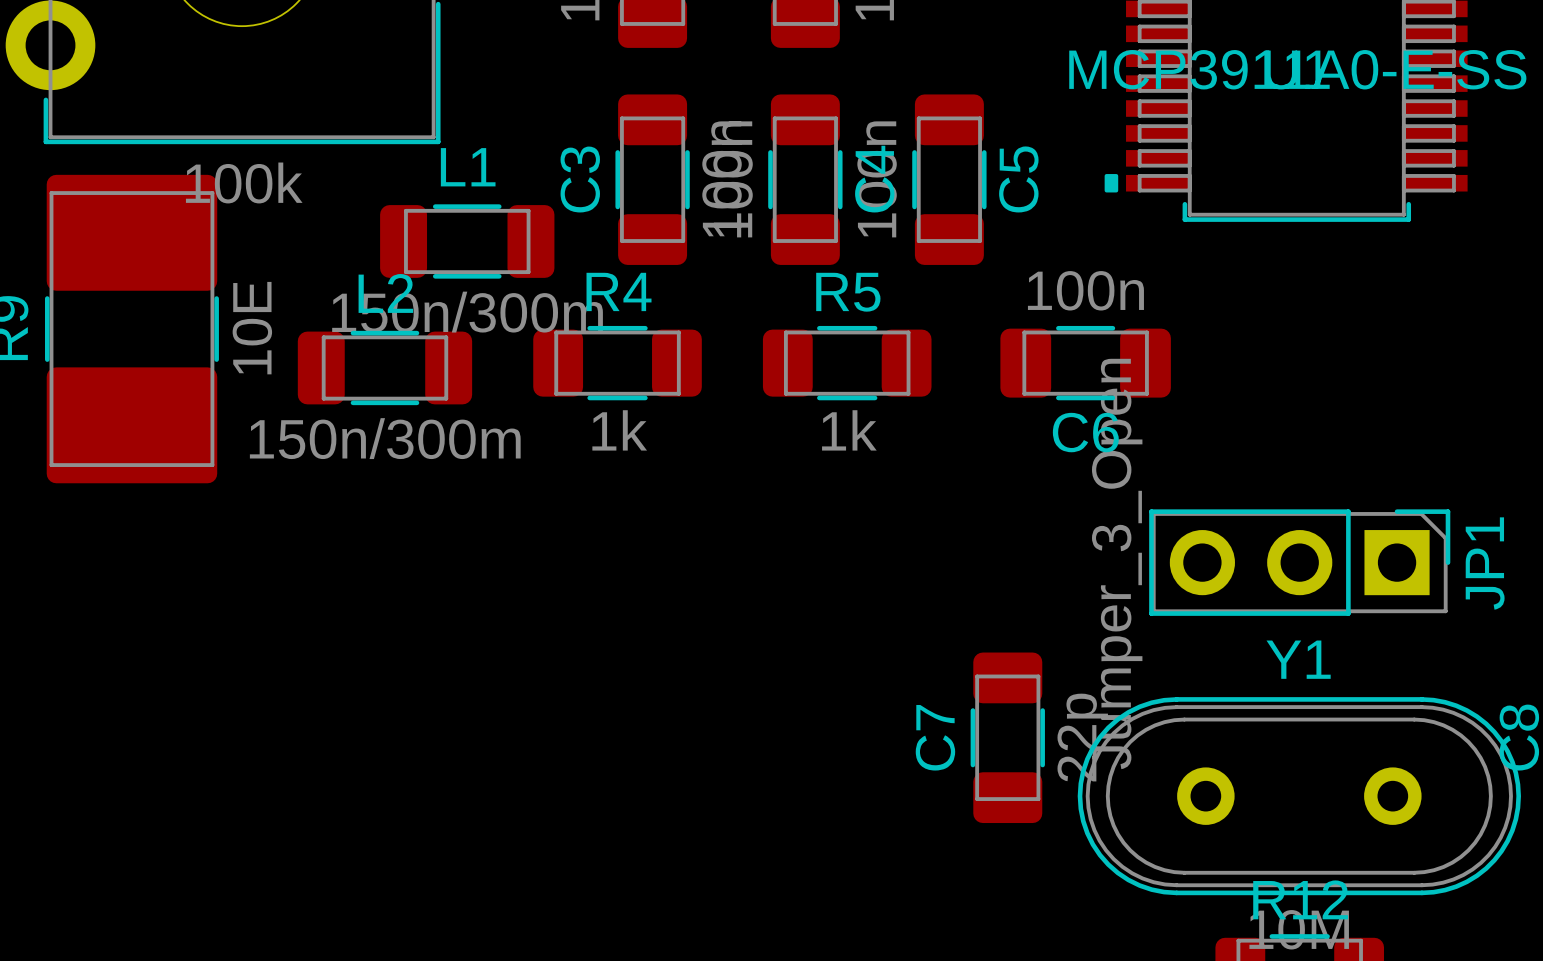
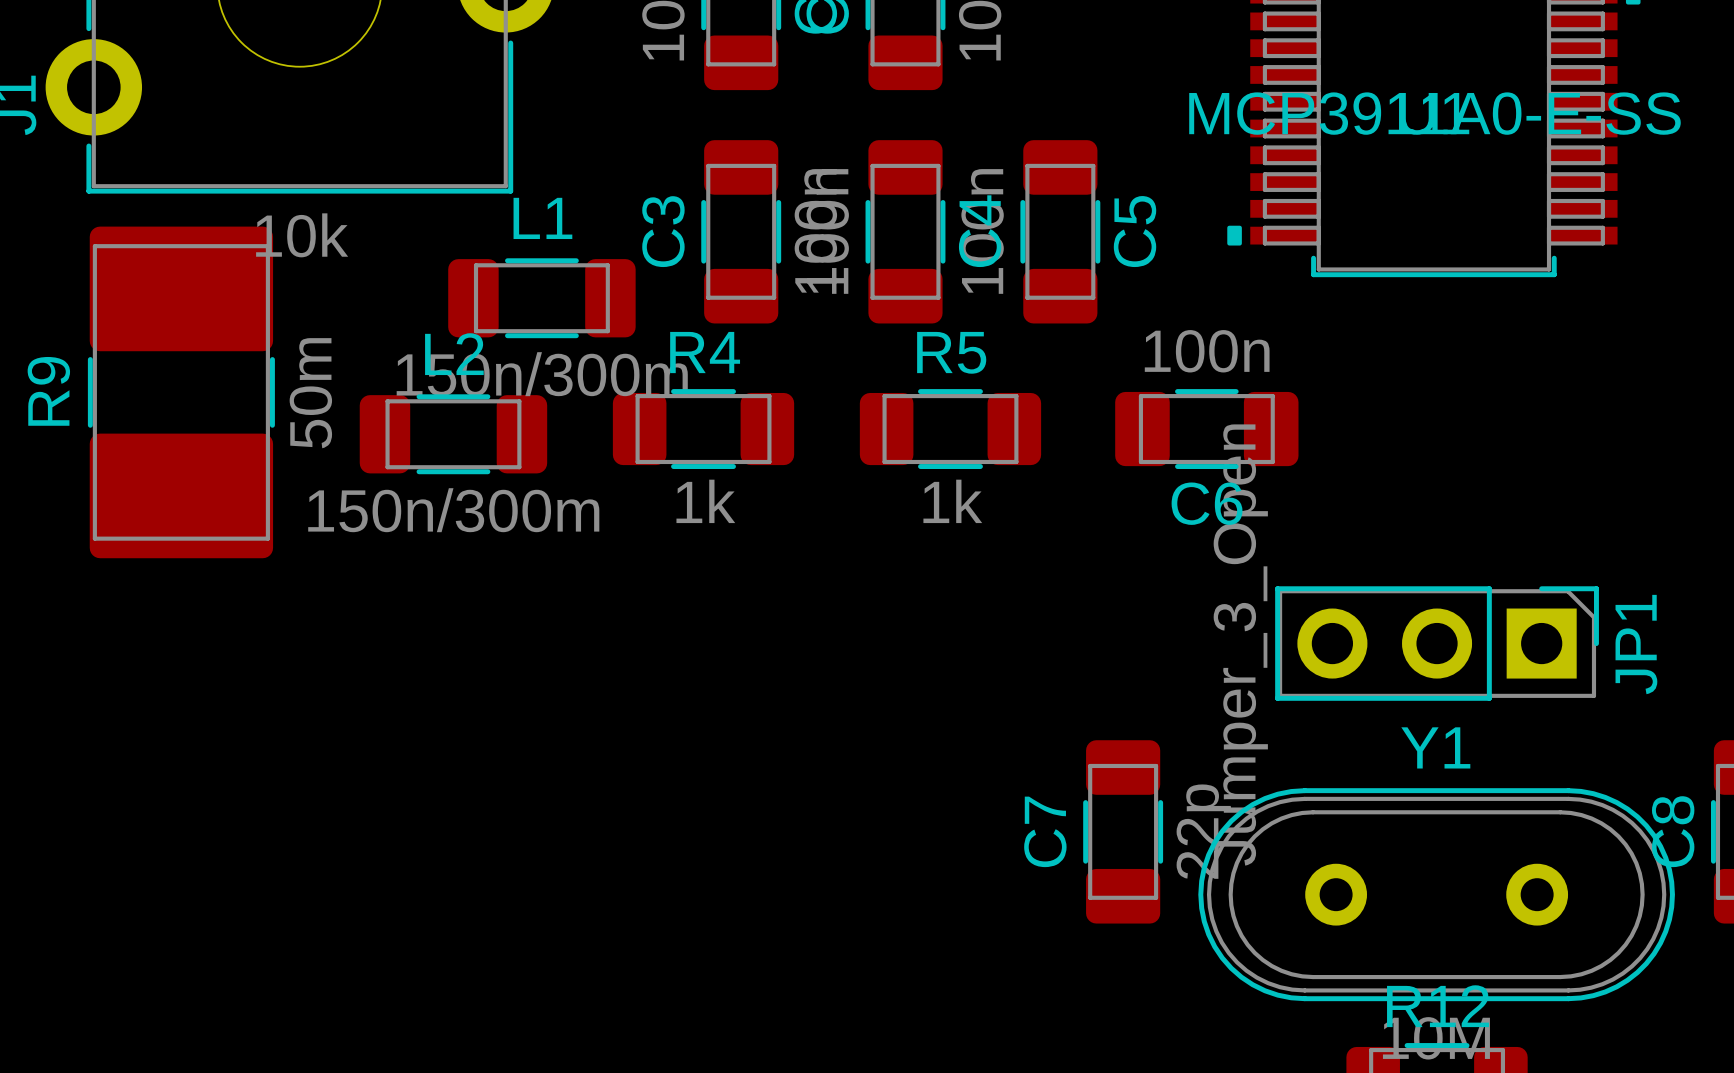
part value: 100k (244, 182) -> 10k (302, 235)
R9 value: 10E (252, 328) -> 50m (310, 393)

